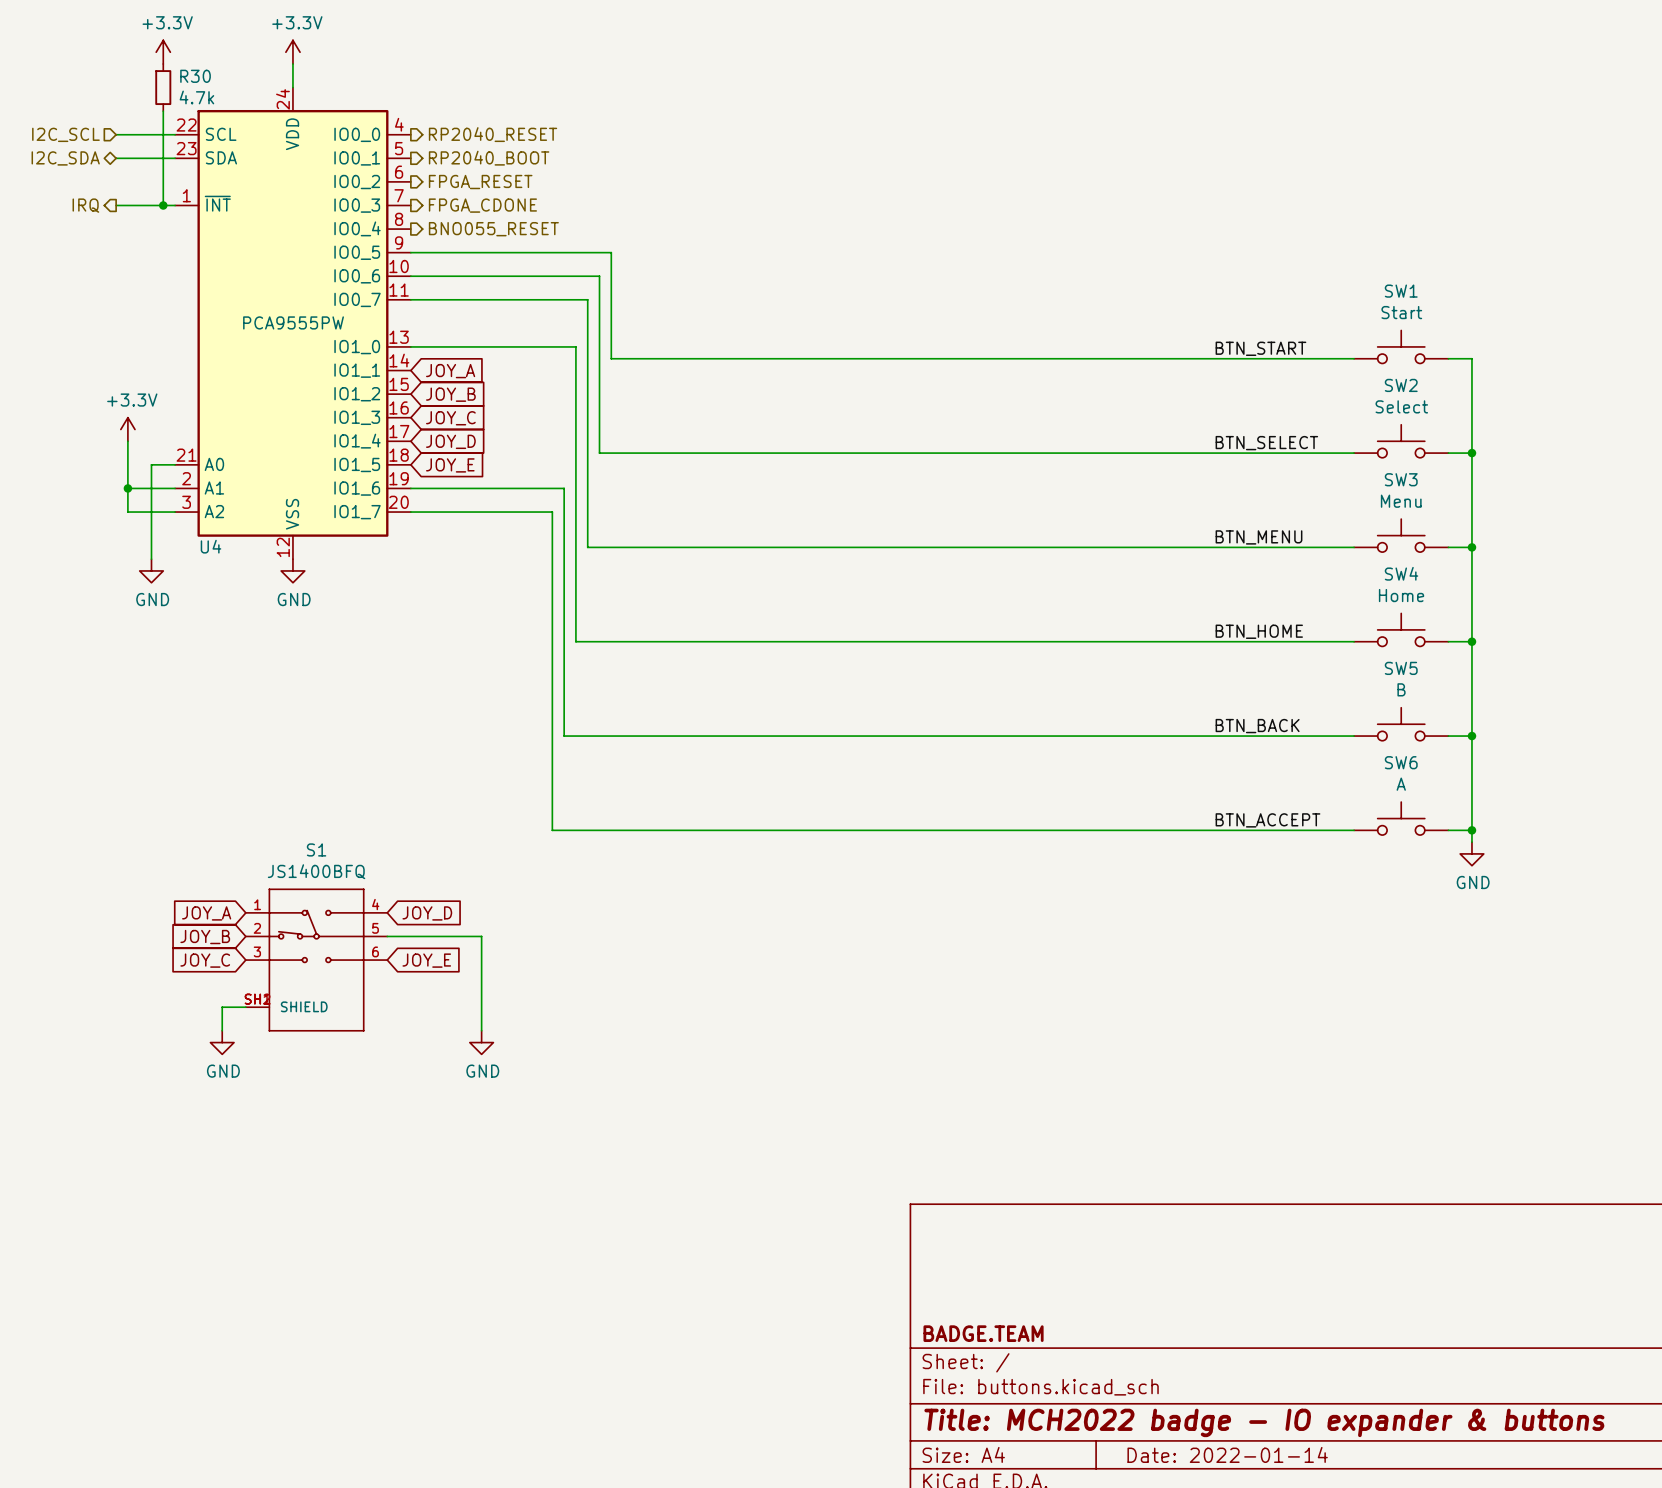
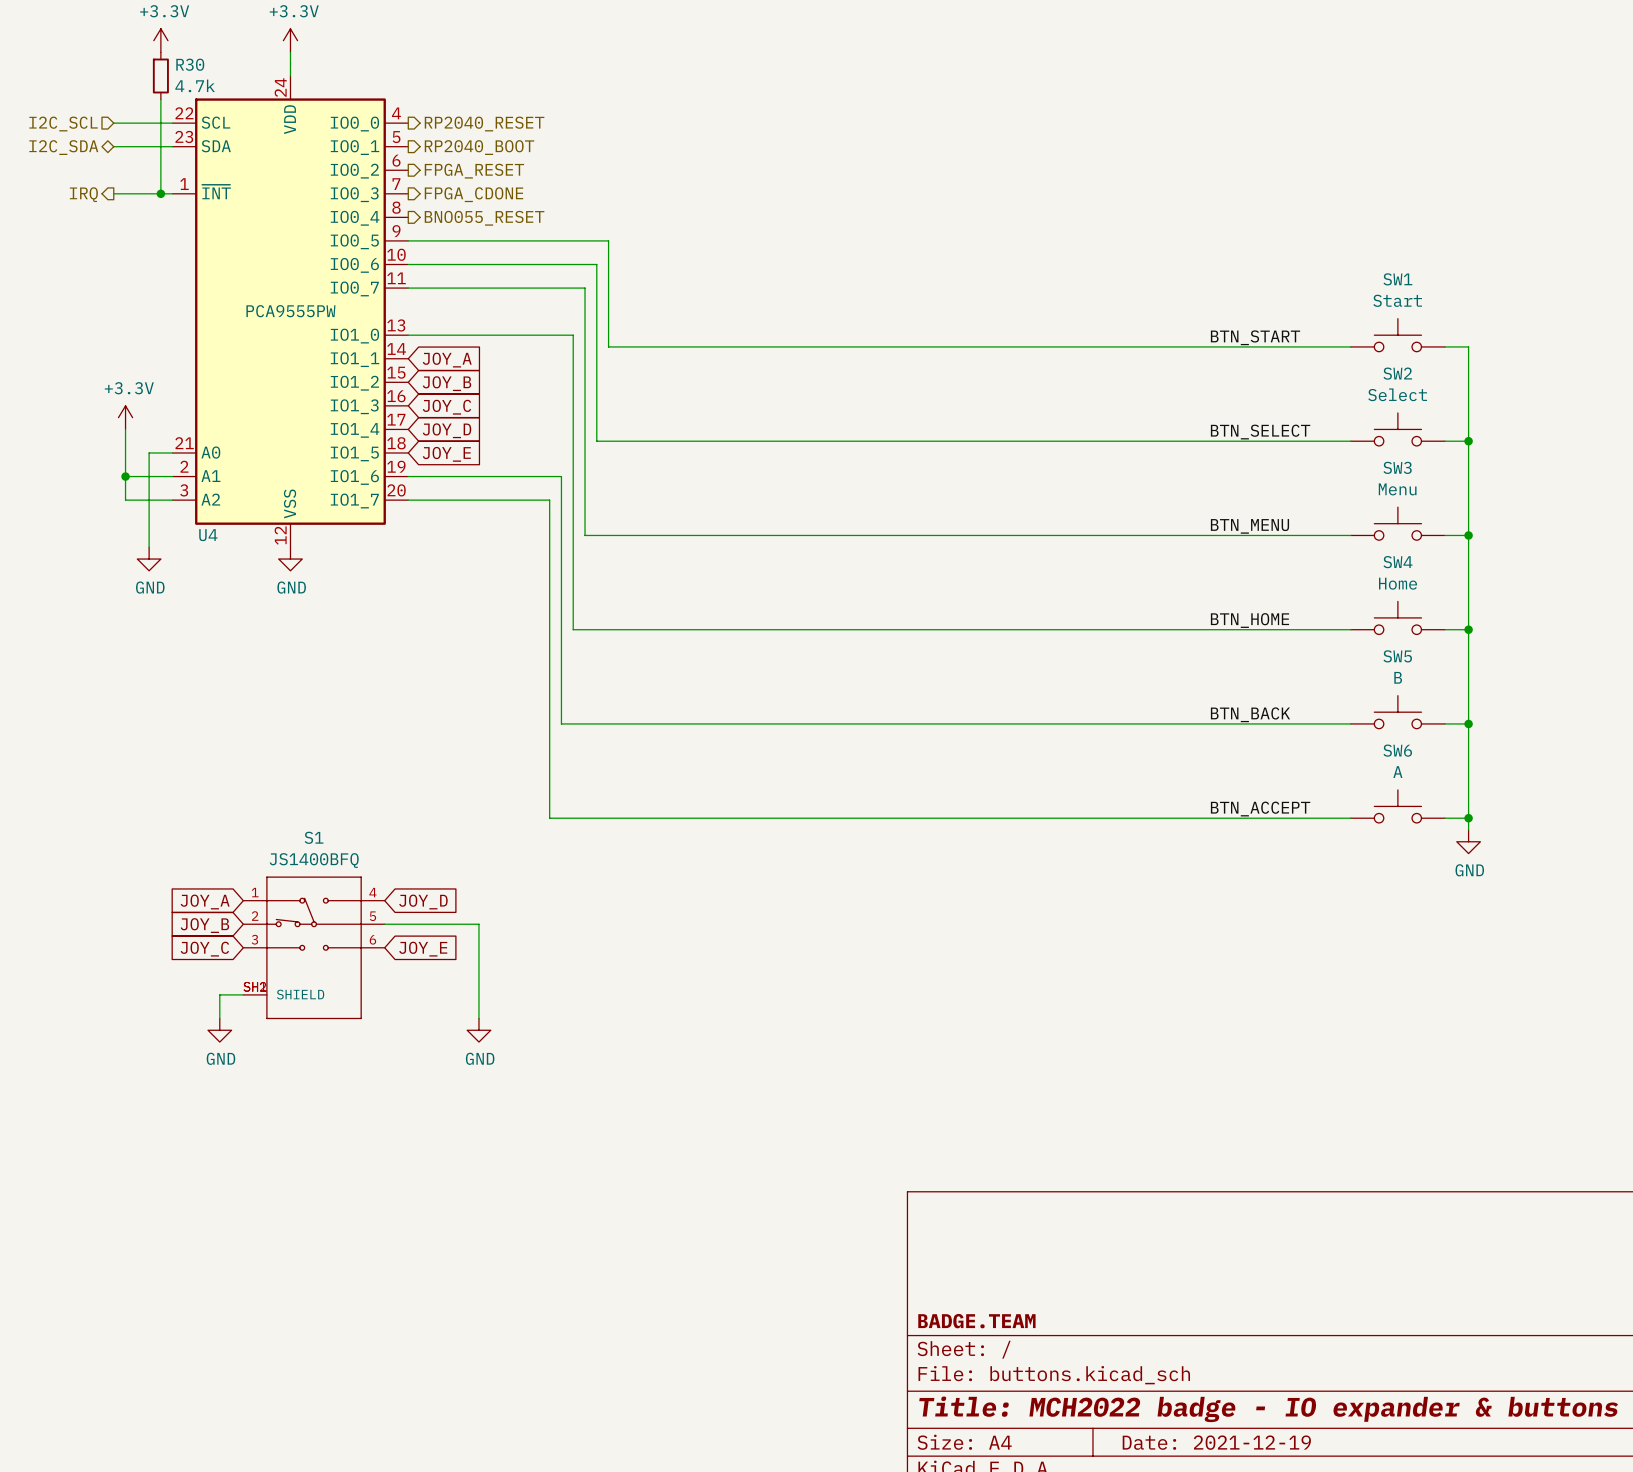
title block: Date: 2022-01-14 (1227, 1454) -> Date: 2021-12-19 (1216, 1442)

